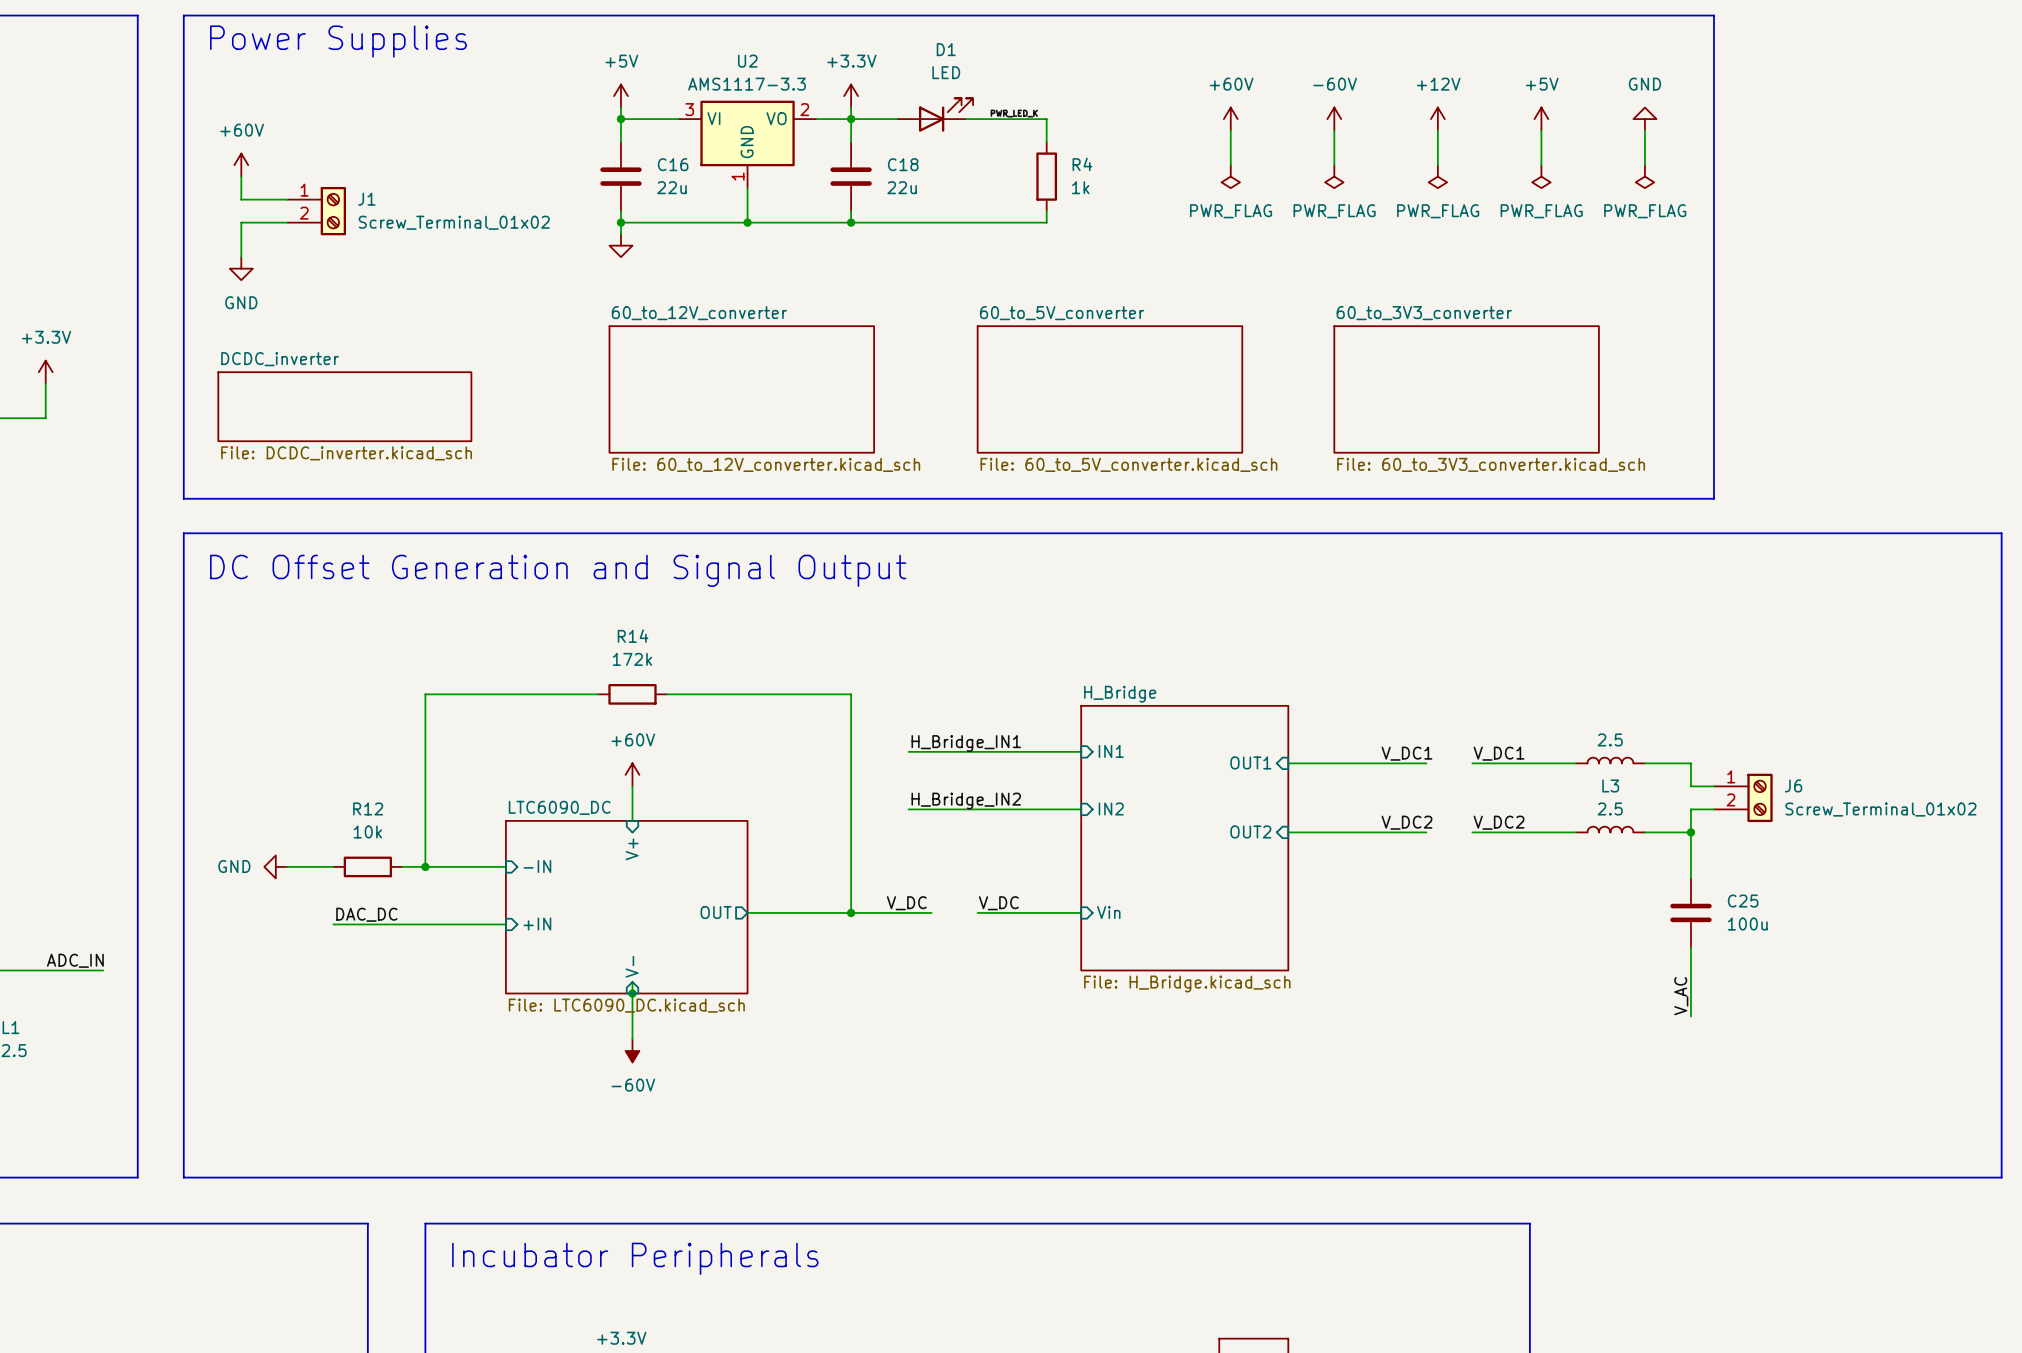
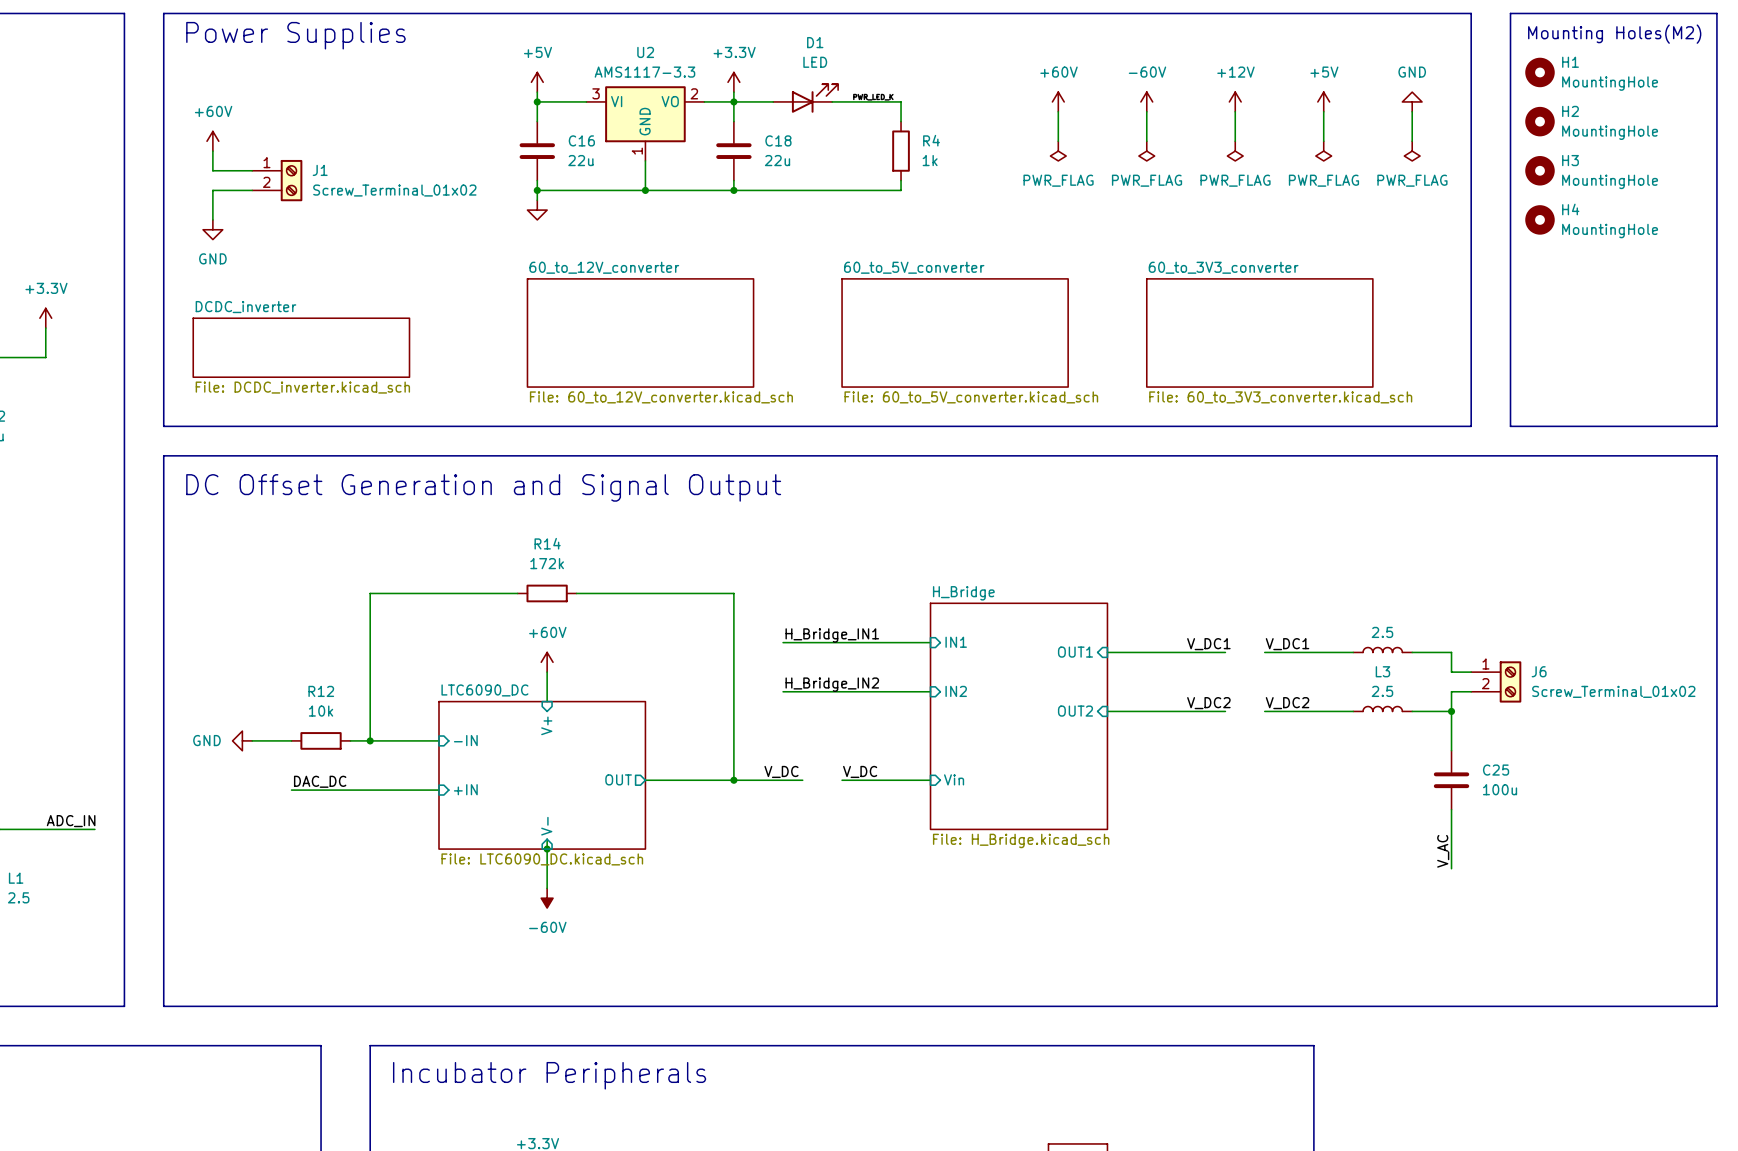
line: none -> (1510, 13) (1716, 13) (1716, 426) (1510, 426) (1510, 13)
text: none -> Mounting Holes(M2) (1614, 34)
H1: none -> MountingHole (1539, 72)
H2: none -> MountingHole (1539, 121)
H3: none -> MountingHole (1539, 170)
H4: none -> MountingHole (1539, 219)

